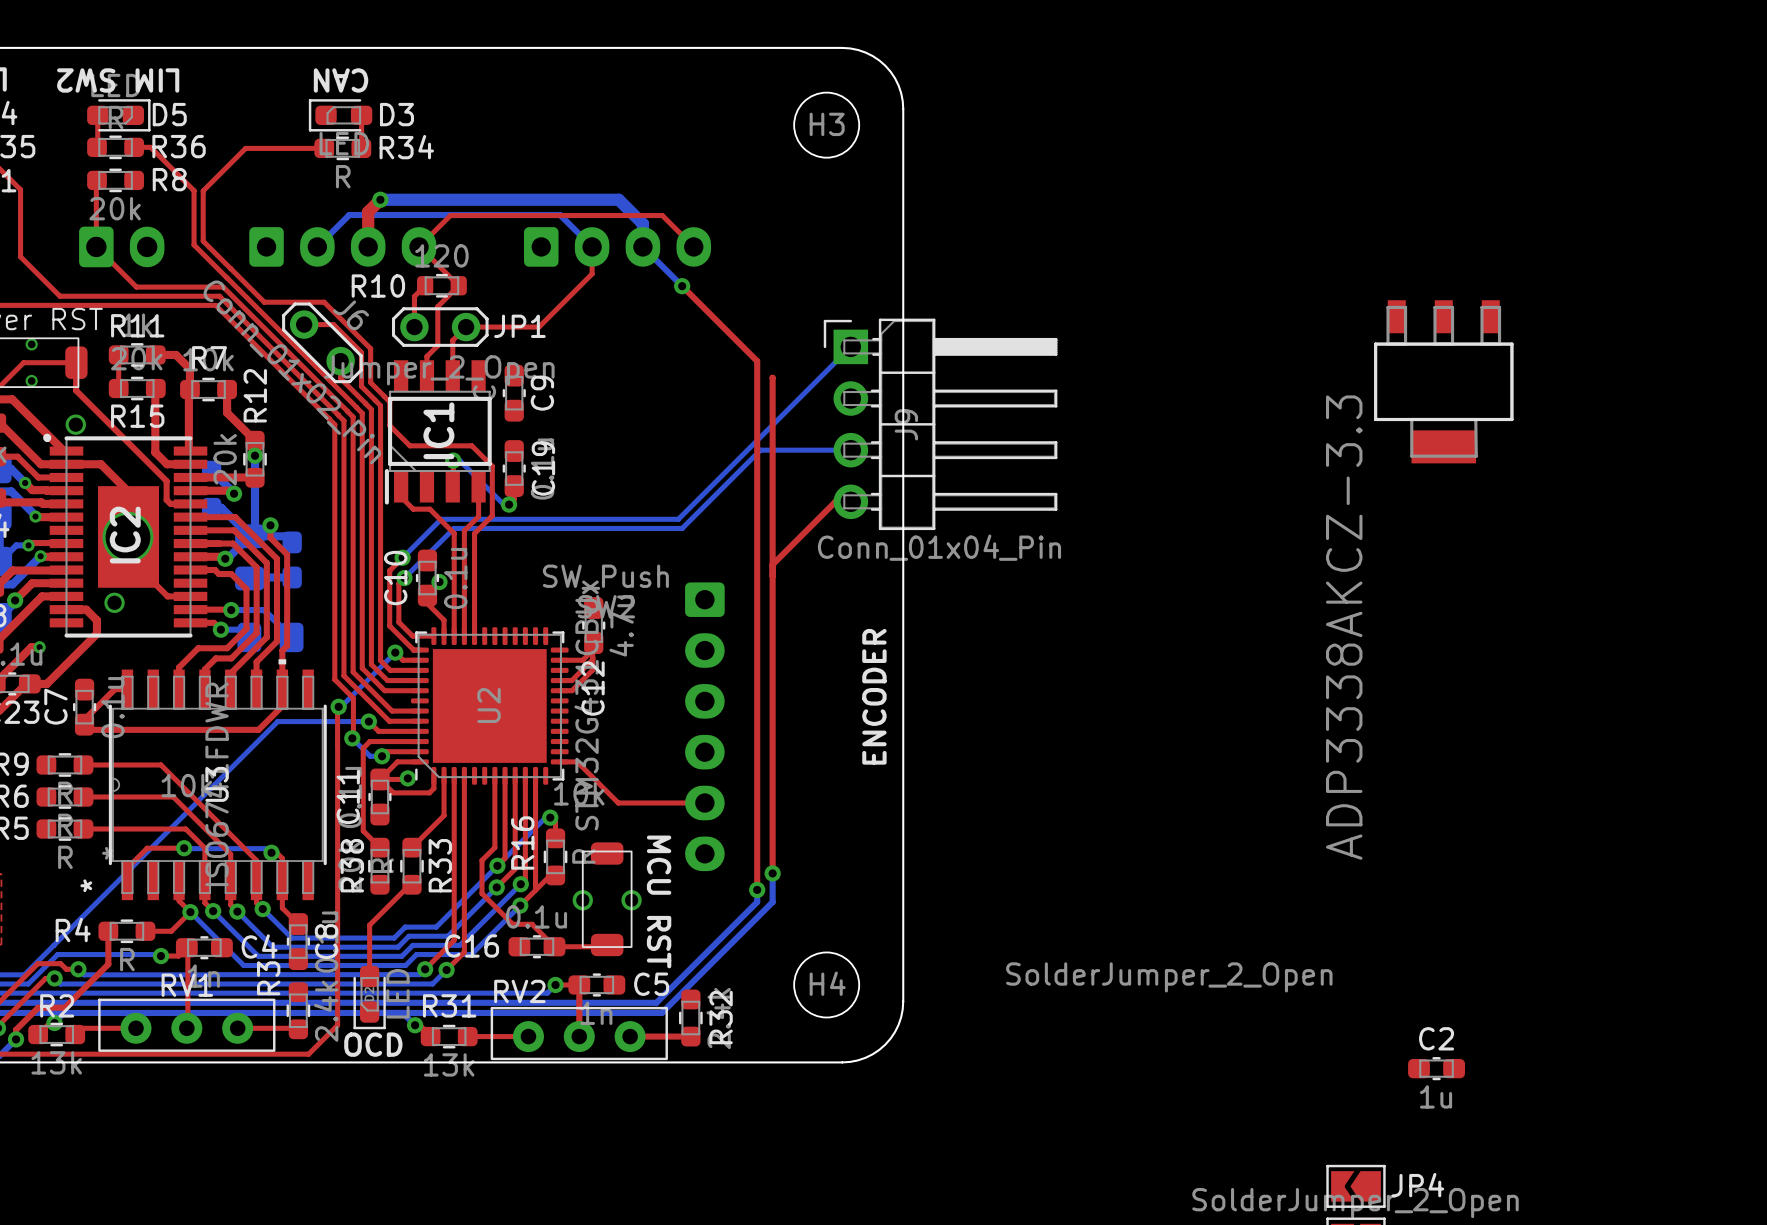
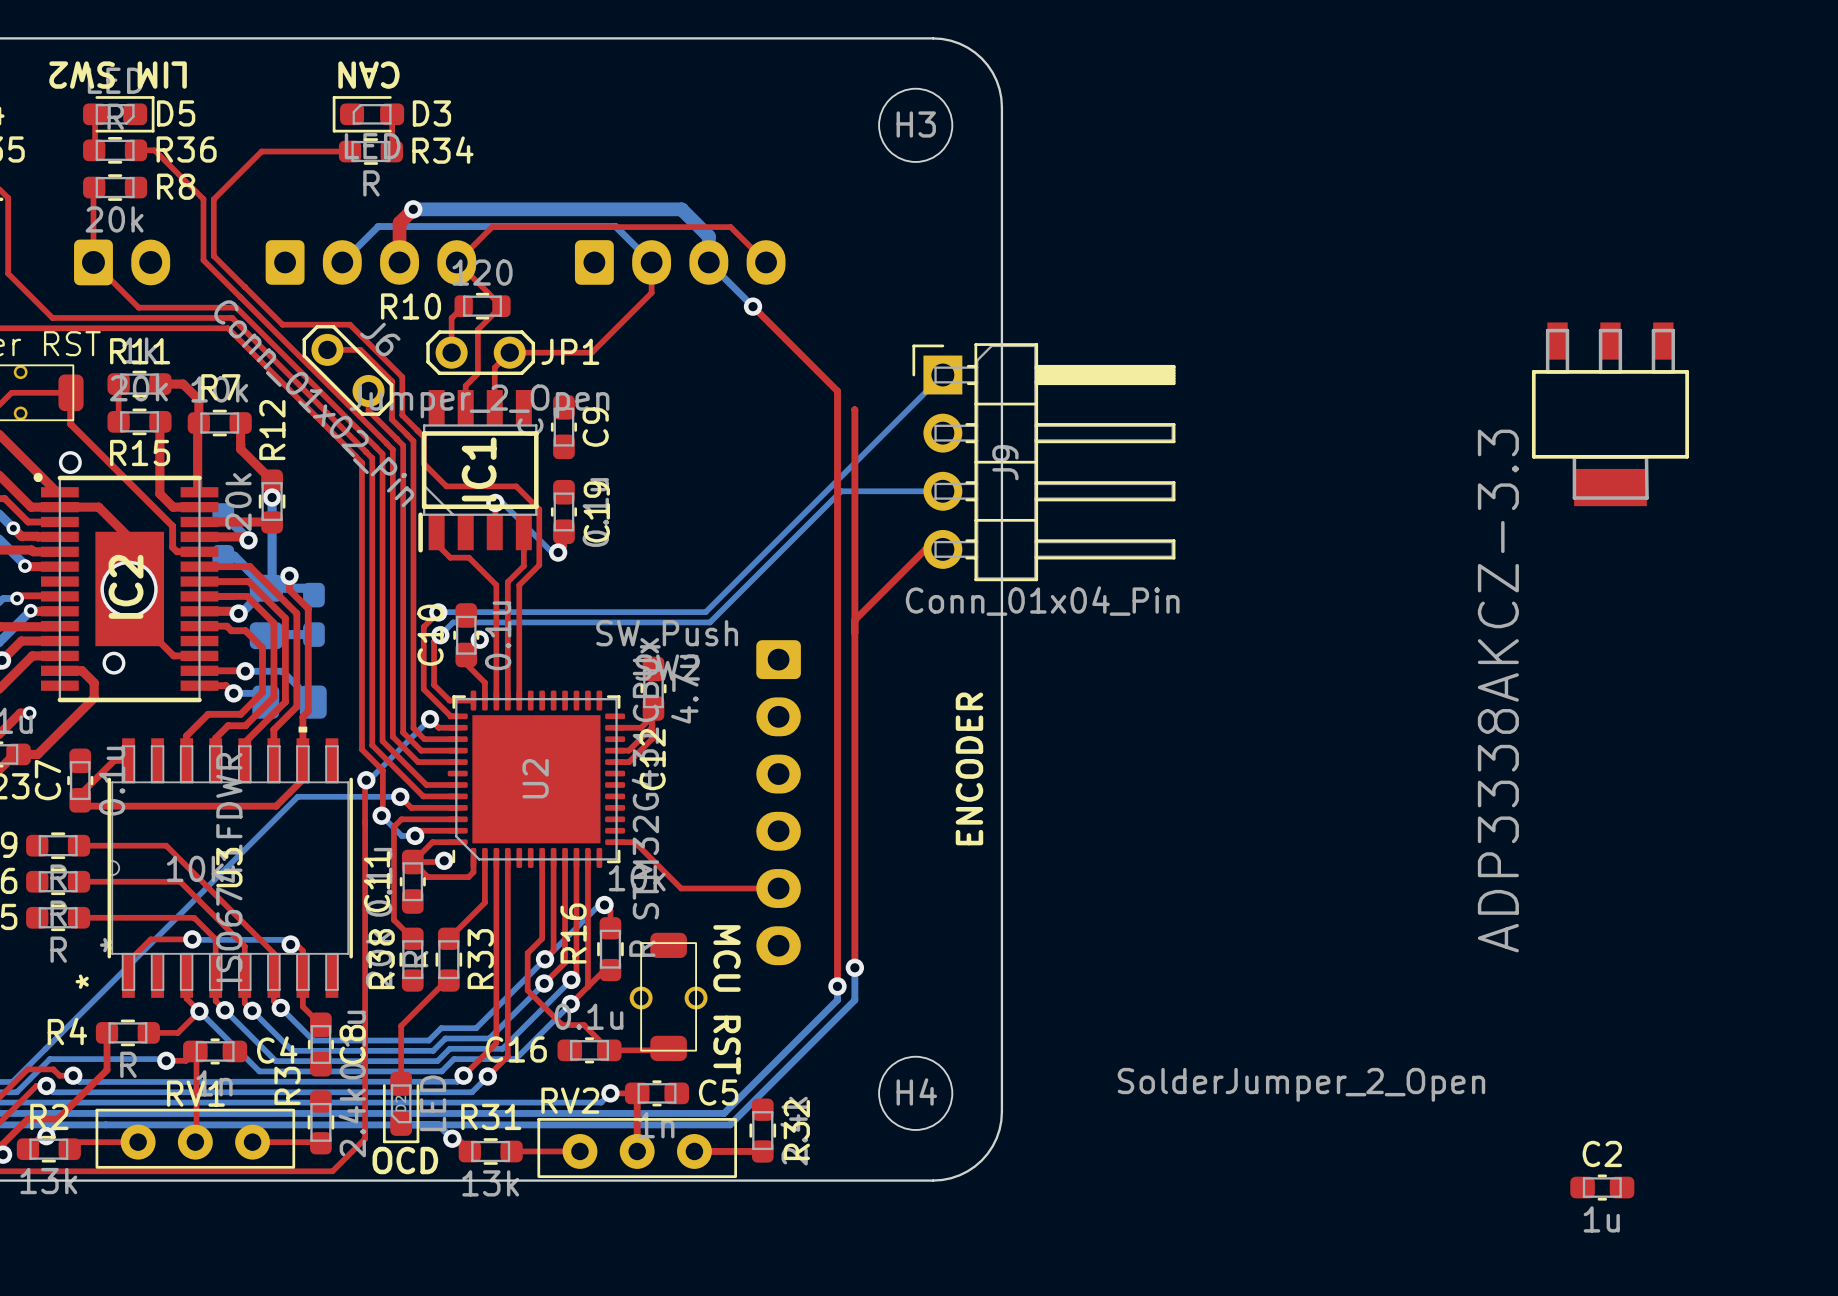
bottom track: (678, 519) (441, 519) (402, 557) -> (748, 569) (705, 612) (438, 612)
bottom track: (682, 528) (454, 528) (415, 566) -> (753, 579) (710, 622) (453, 622)

